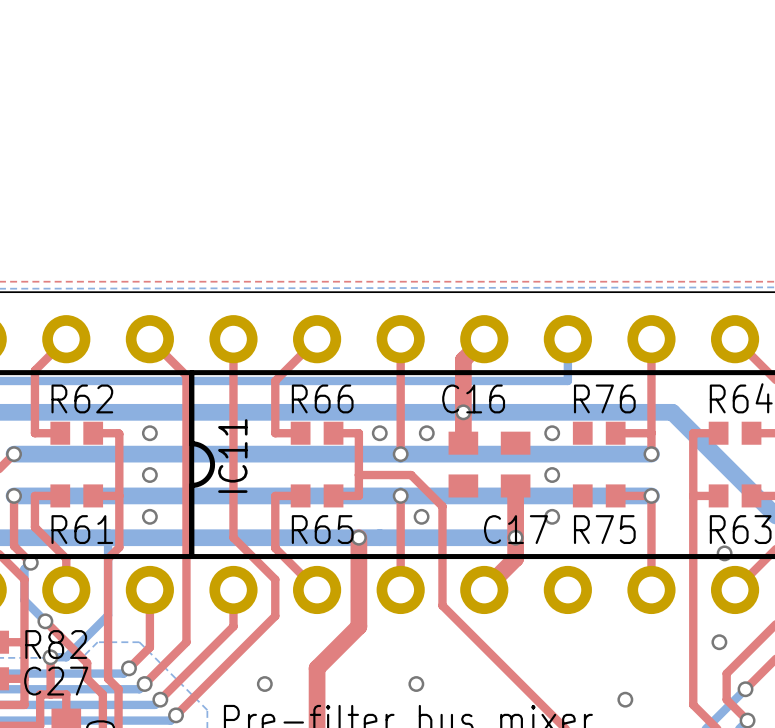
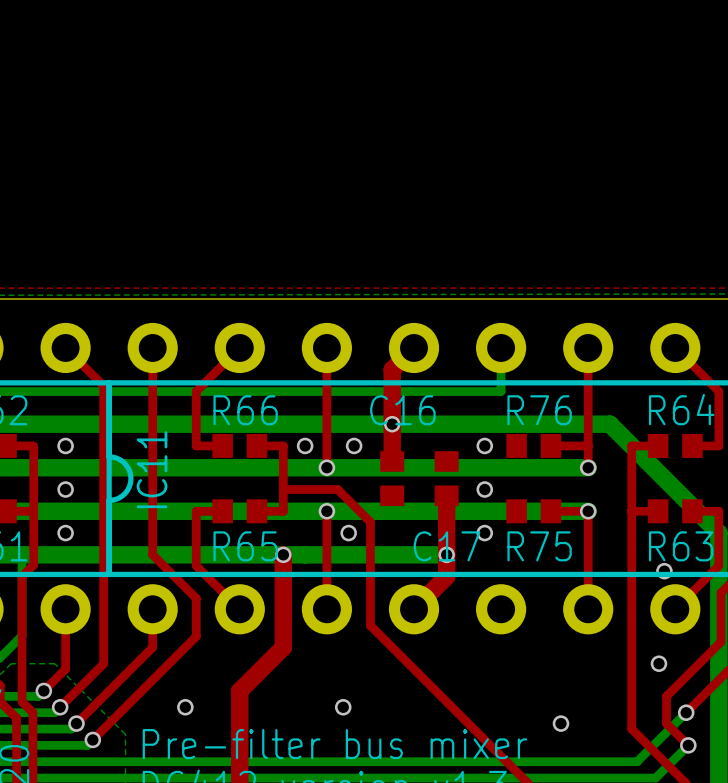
C16 footprint: [448, 431, 479, 498] -> [380, 451, 405, 507]
C17 footprint: [500, 431, 531, 498] -> [434, 451, 459, 507]

